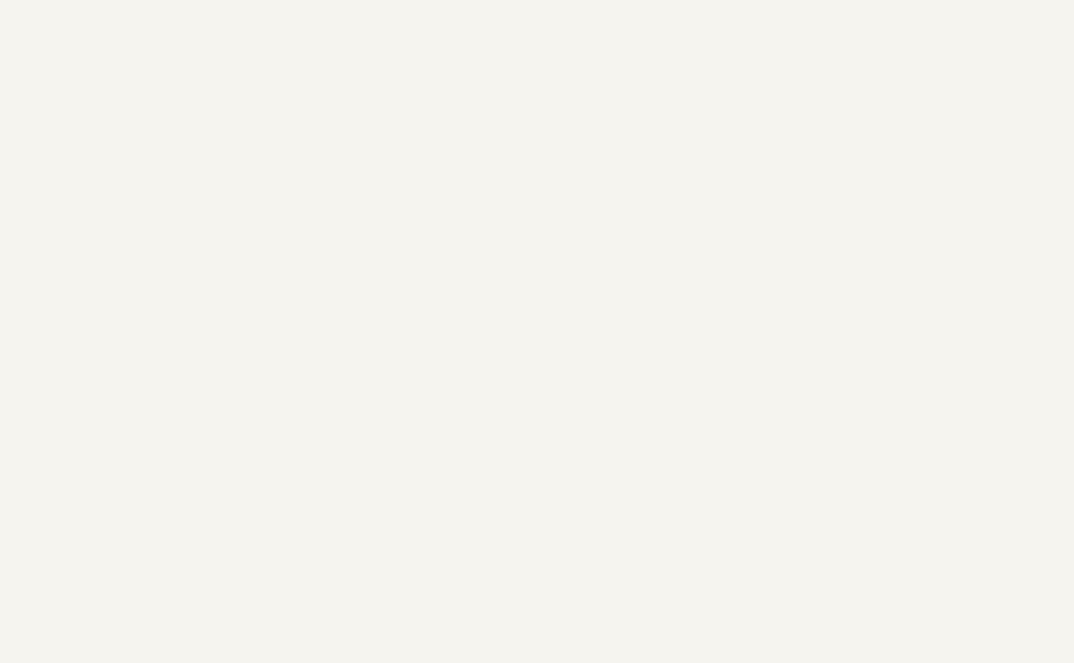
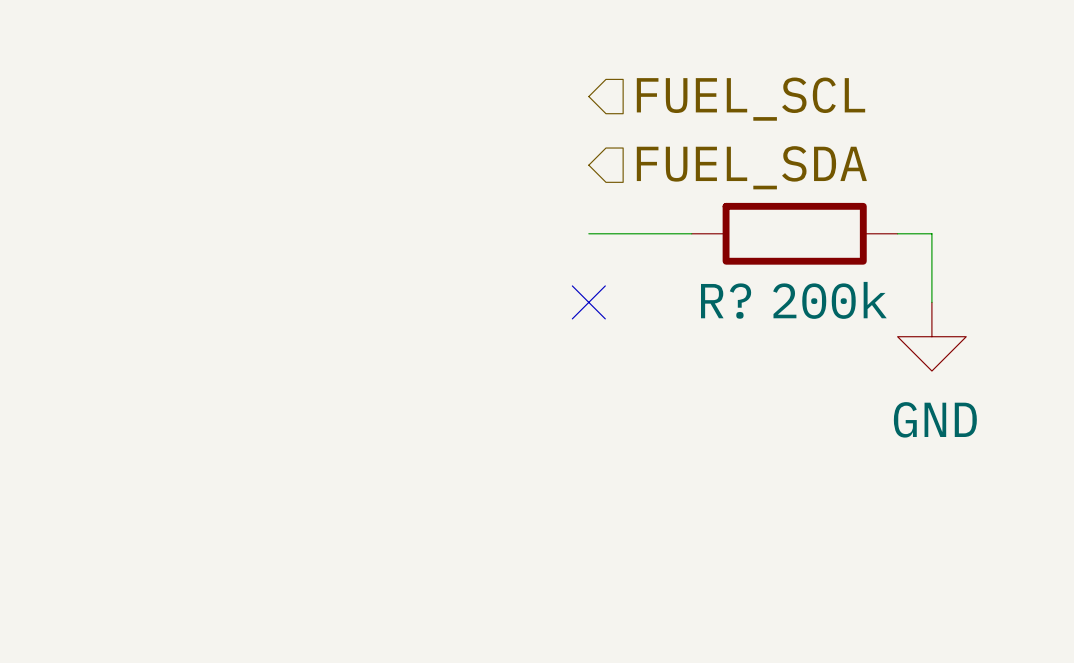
hierarchical label: none -> FUEL_SCL (750, 99)
hierarchical label: none -> FUEL_SDA (751, 167)
wire: none -> (588, 233) (691, 233)
R?: none -> 200k (794, 233)
wire: none -> (897, 233) (931, 233) (931, 302)
no-connect mark: none -> (588, 302)
power symbol: none -> GND (931, 336)

